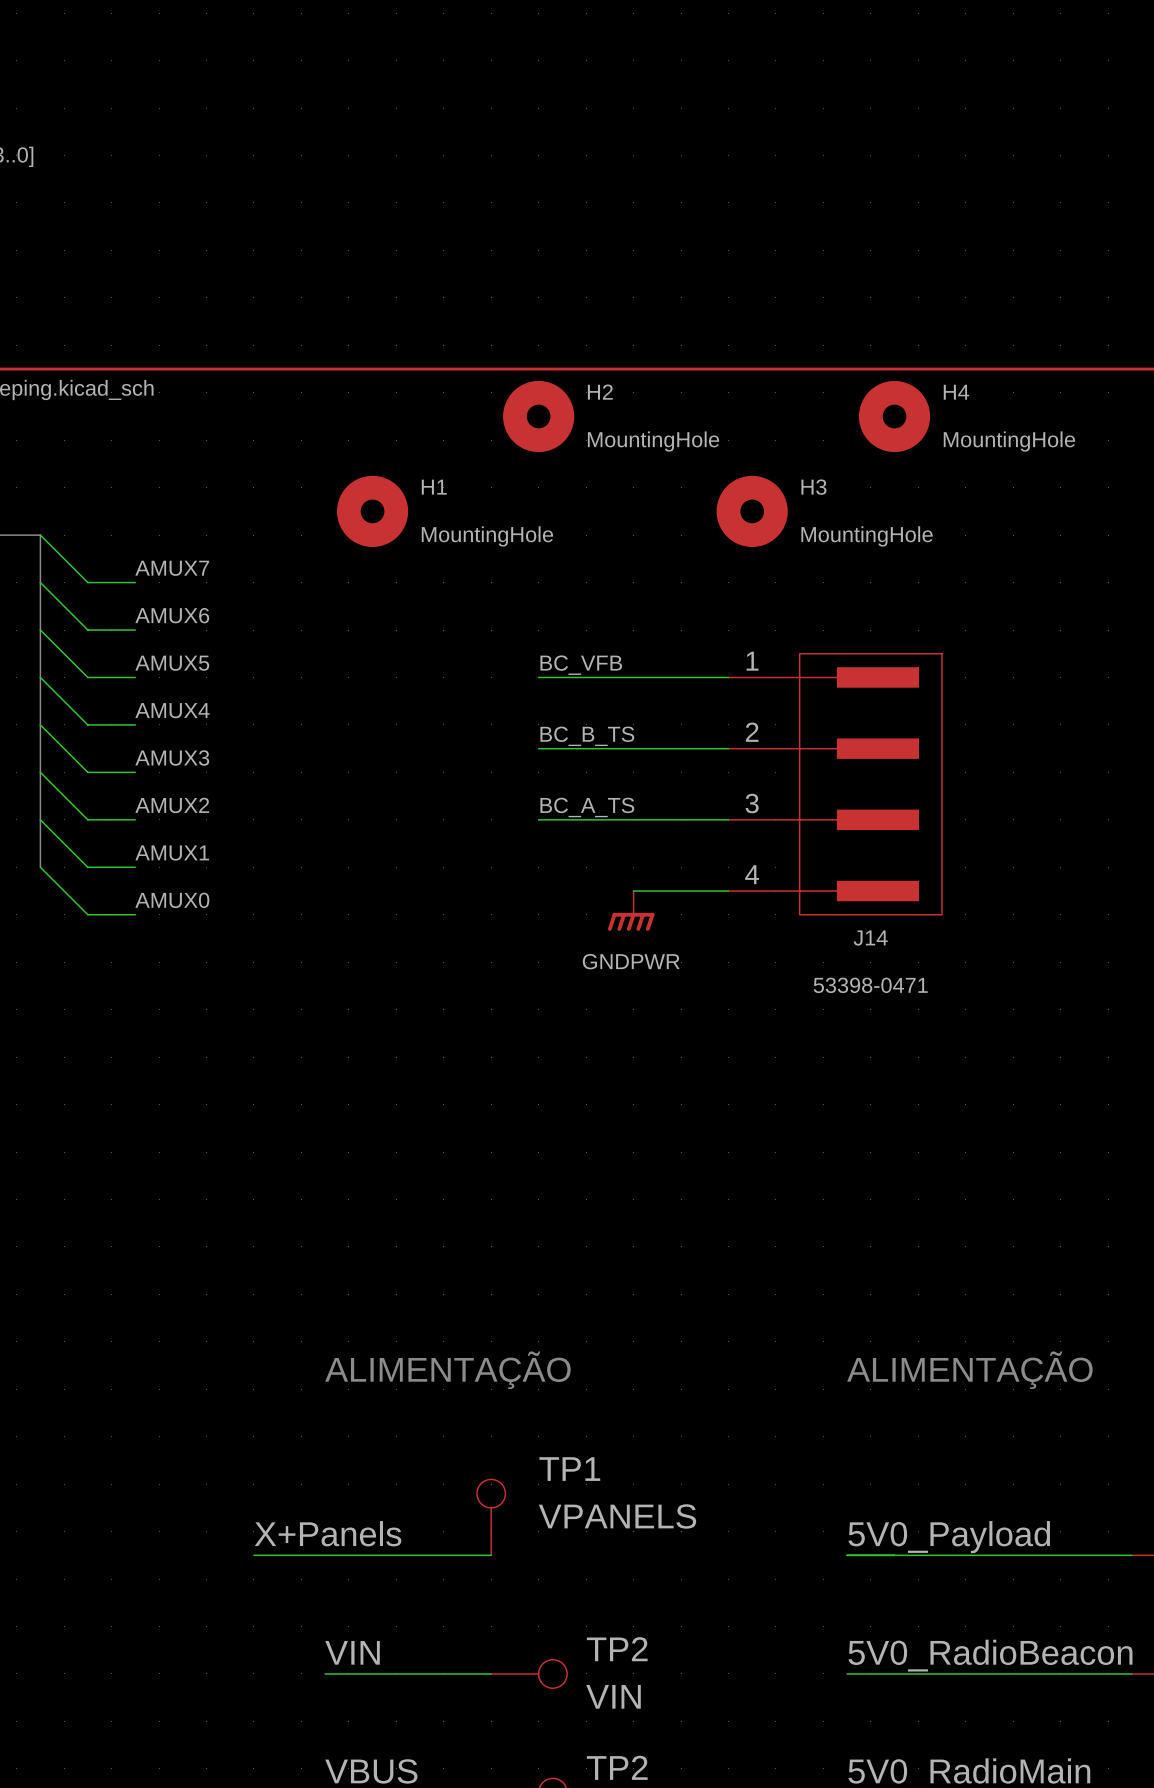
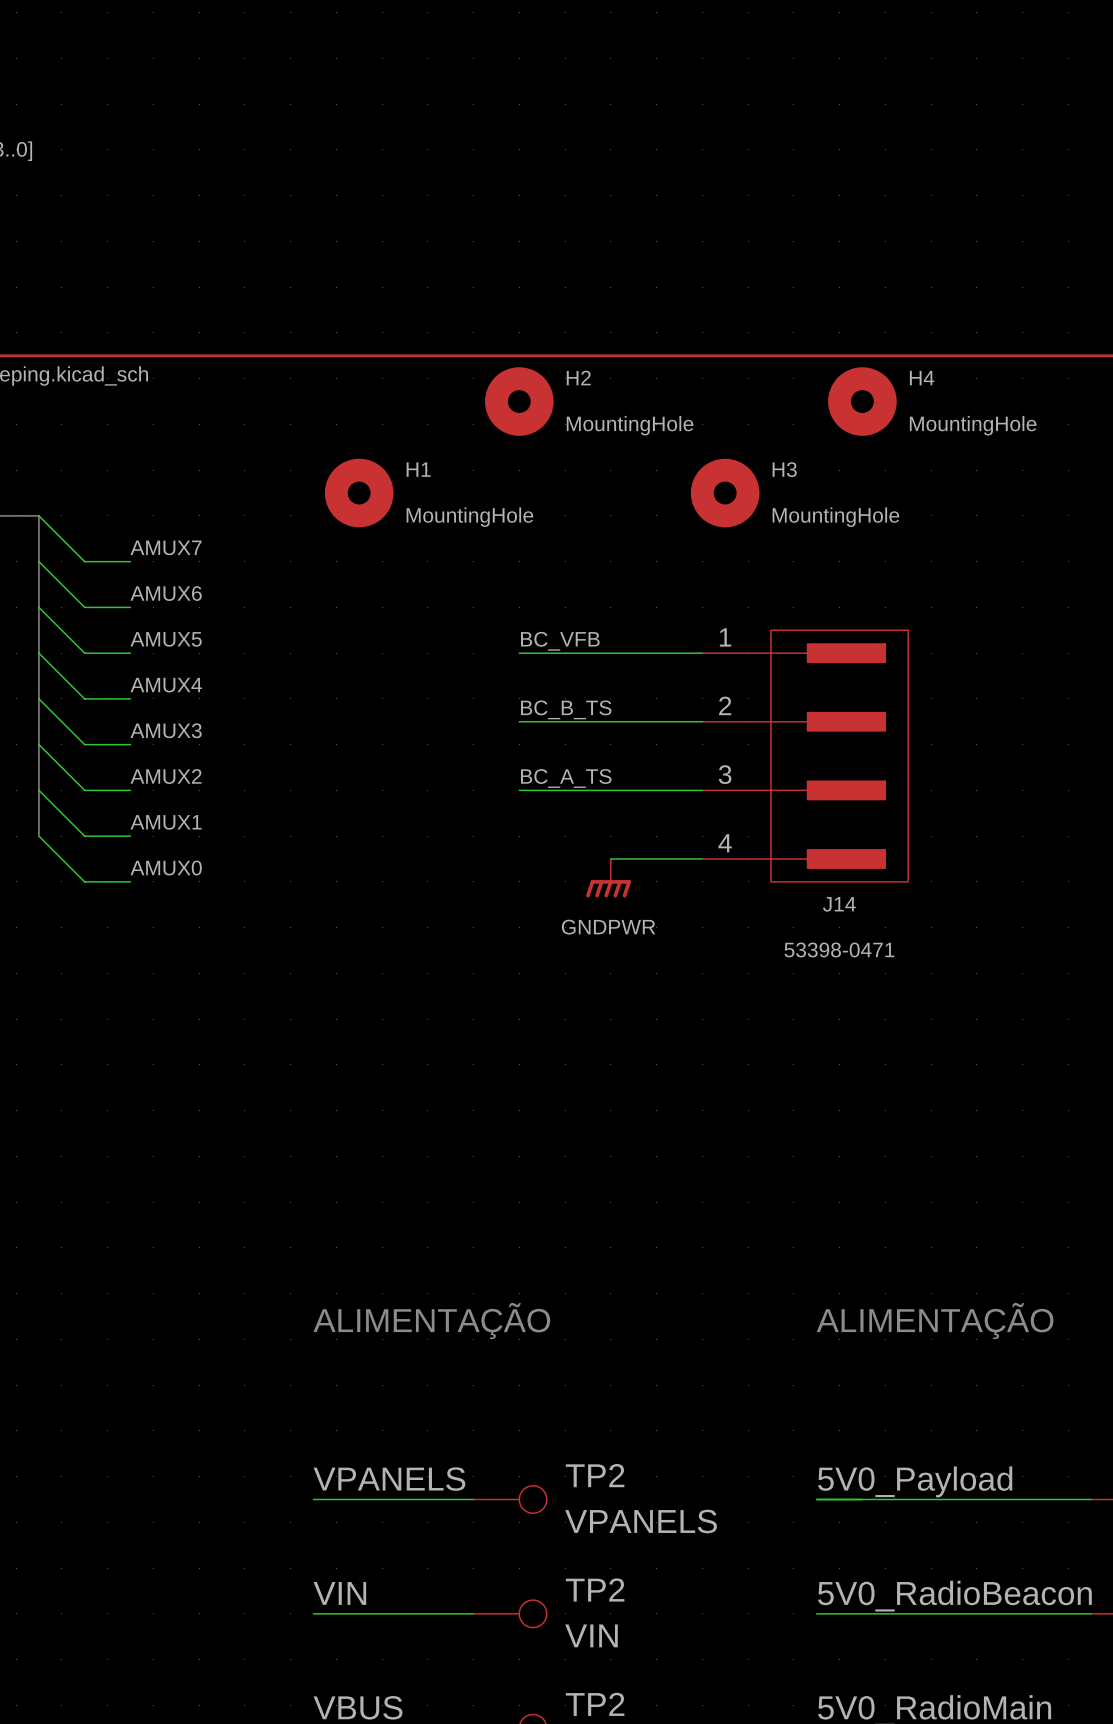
TP1: VPANELS (491, 1517) -> none
label: X+Panels (328, 1533) -> none
label: none -> VPANELS (389, 1479)
wire: (253, 1555) (325, 1555) -> none
TP2: none -> VPANELS (510, 1499)

